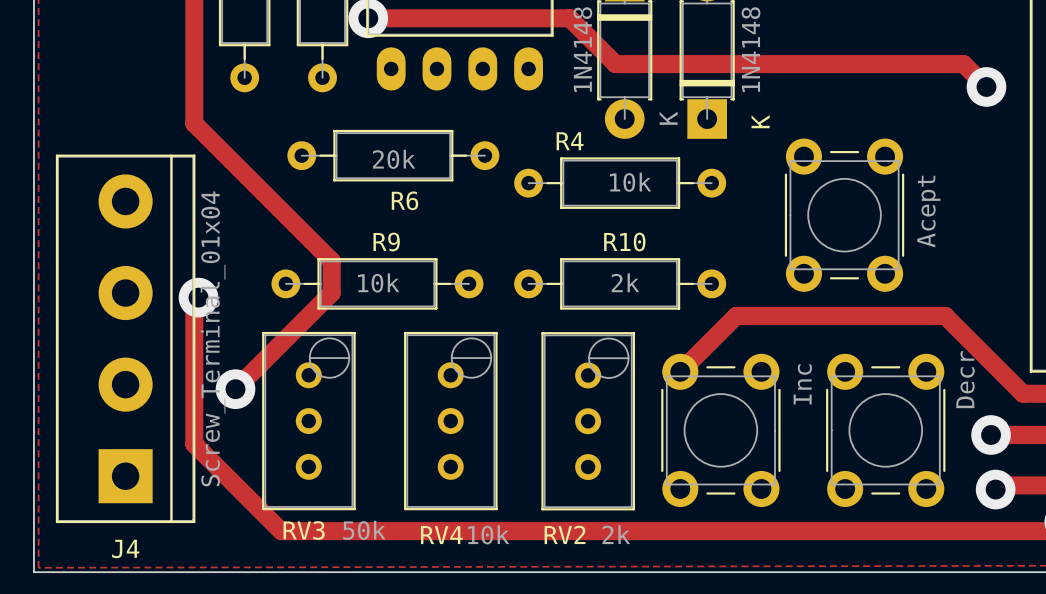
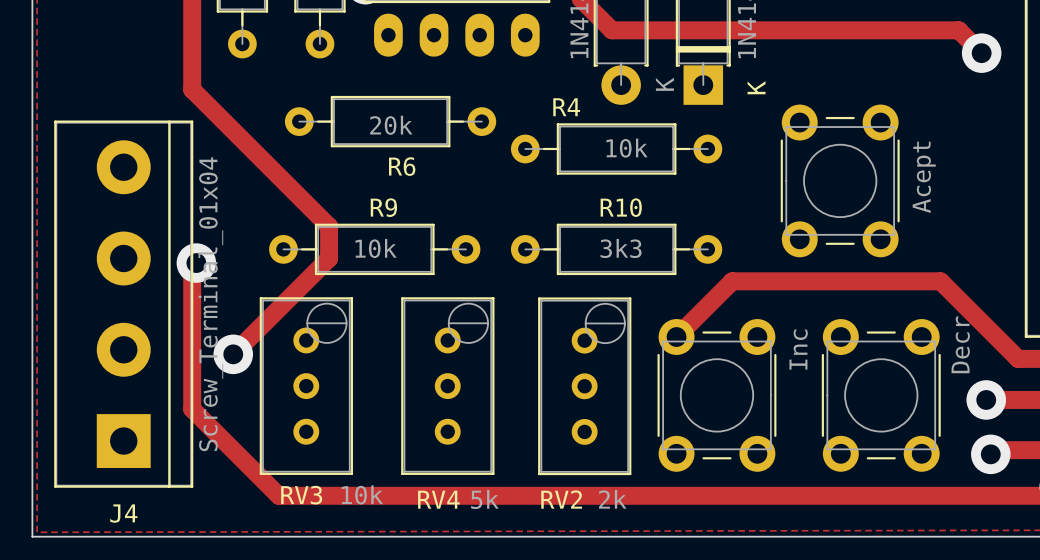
R10 value: 2k (625, 282) -> 3k3 (621, 248)
RV3 value: 50k (364, 530) -> 10k (362, 494)
RV4 value: 10k (488, 534) -> 5k (484, 499)

